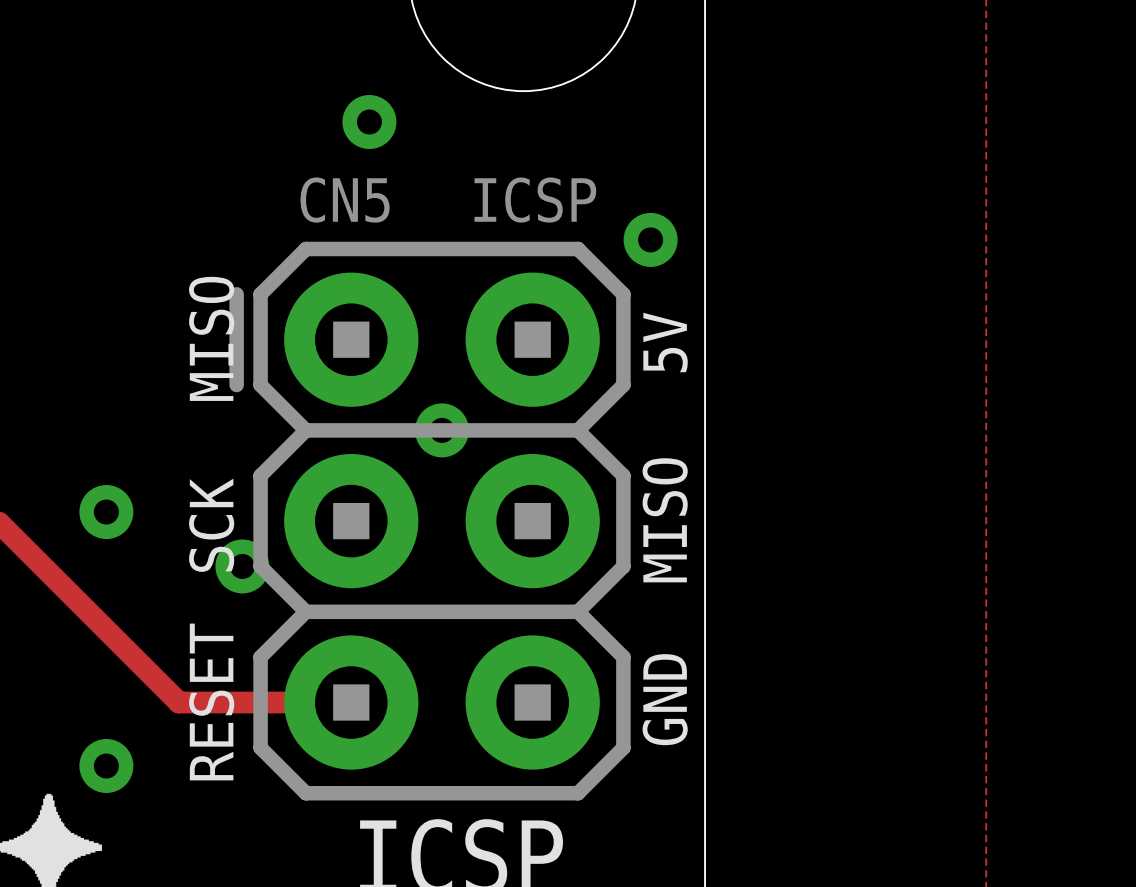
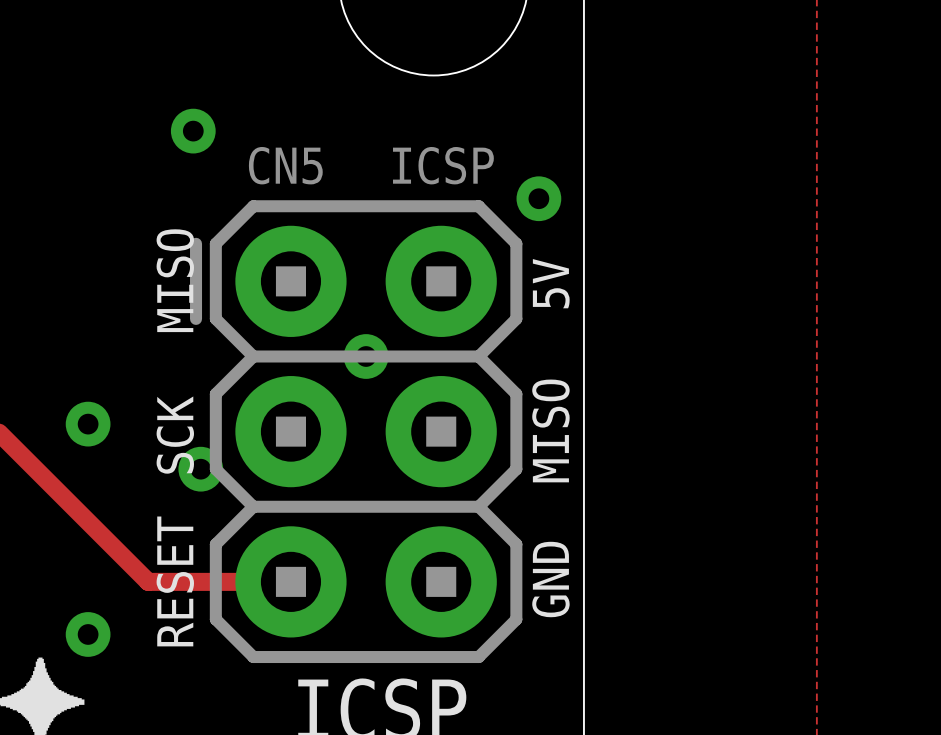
via position: (369, 122) -> (193, 131)

